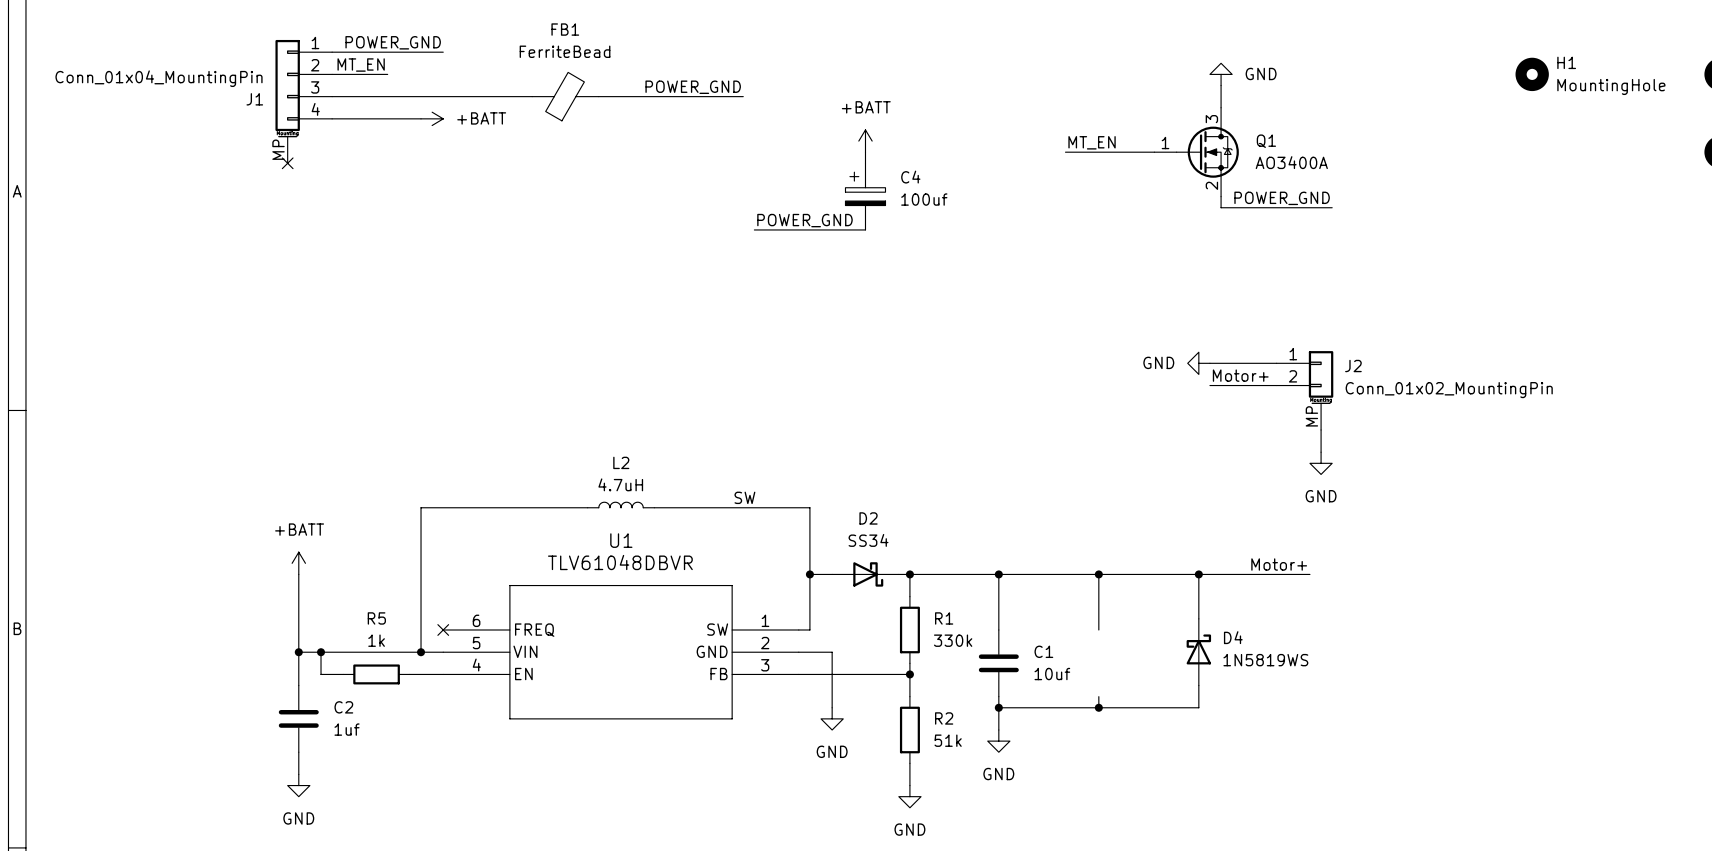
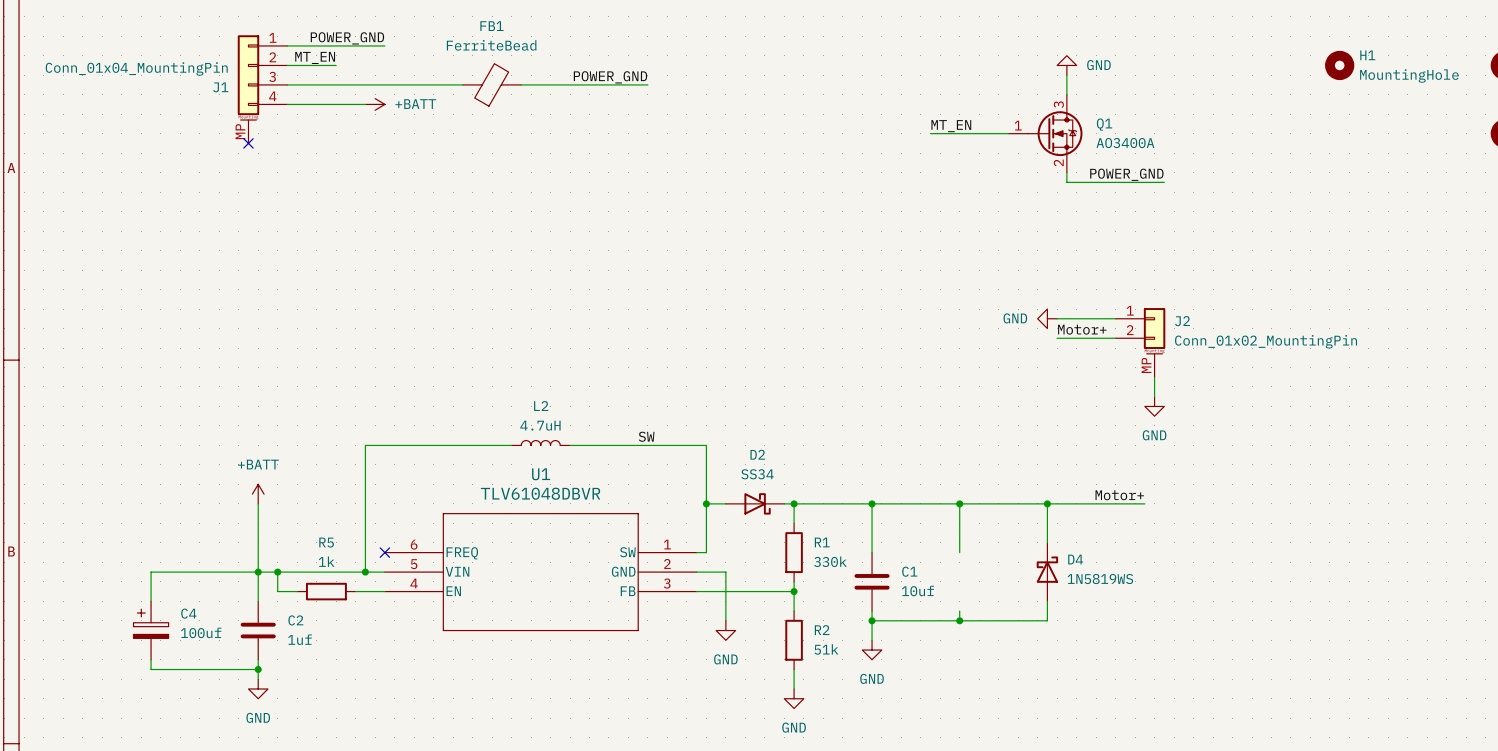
power symbol: +BATT (865, 141) -> none
wire: (865, 152) (865, 163) -> none
C4 position: (865, 196) -> (151, 630)
label: POWER_GND (804, 220) -> none
wire: (754, 229) (865, 229) -> none
wire: none -> (258, 572) (151, 572) (151, 601)
wire: none -> (151, 659) (151, 669) (258, 669)
junction: none -> (258, 669)

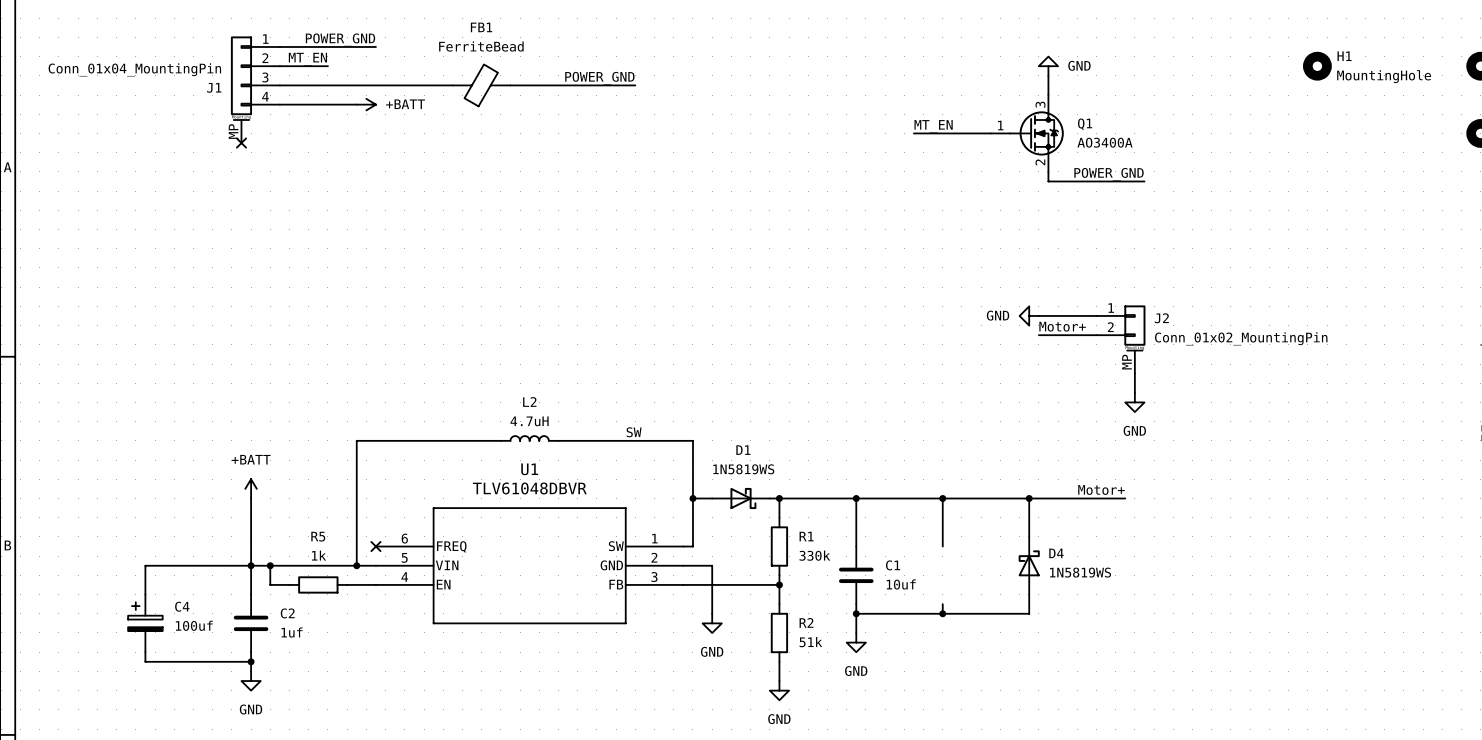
D2 name: D2 (757, 454) -> D1 (743, 450)
D2 value: SS34 (757, 474) -> 1N5819WS (743, 469)

